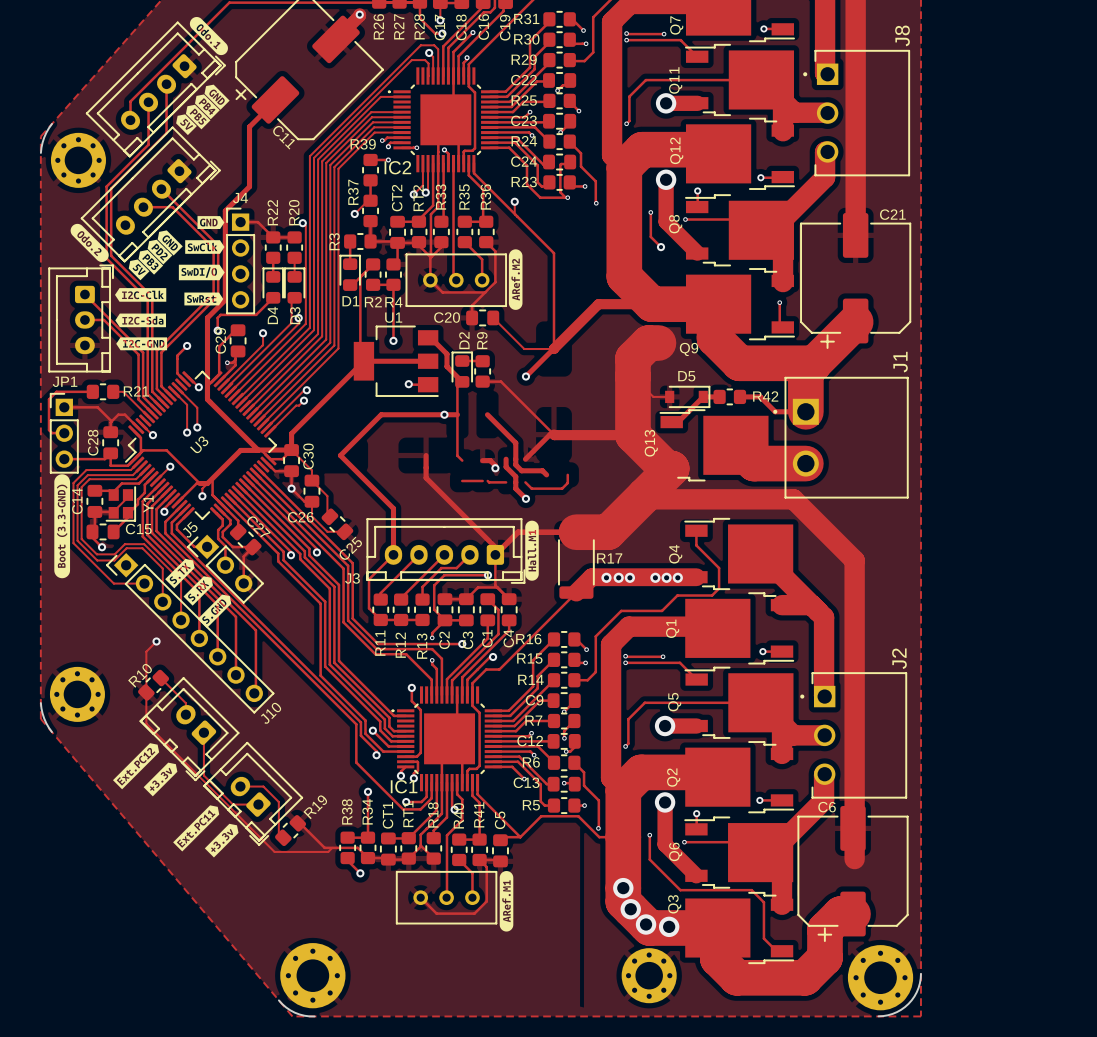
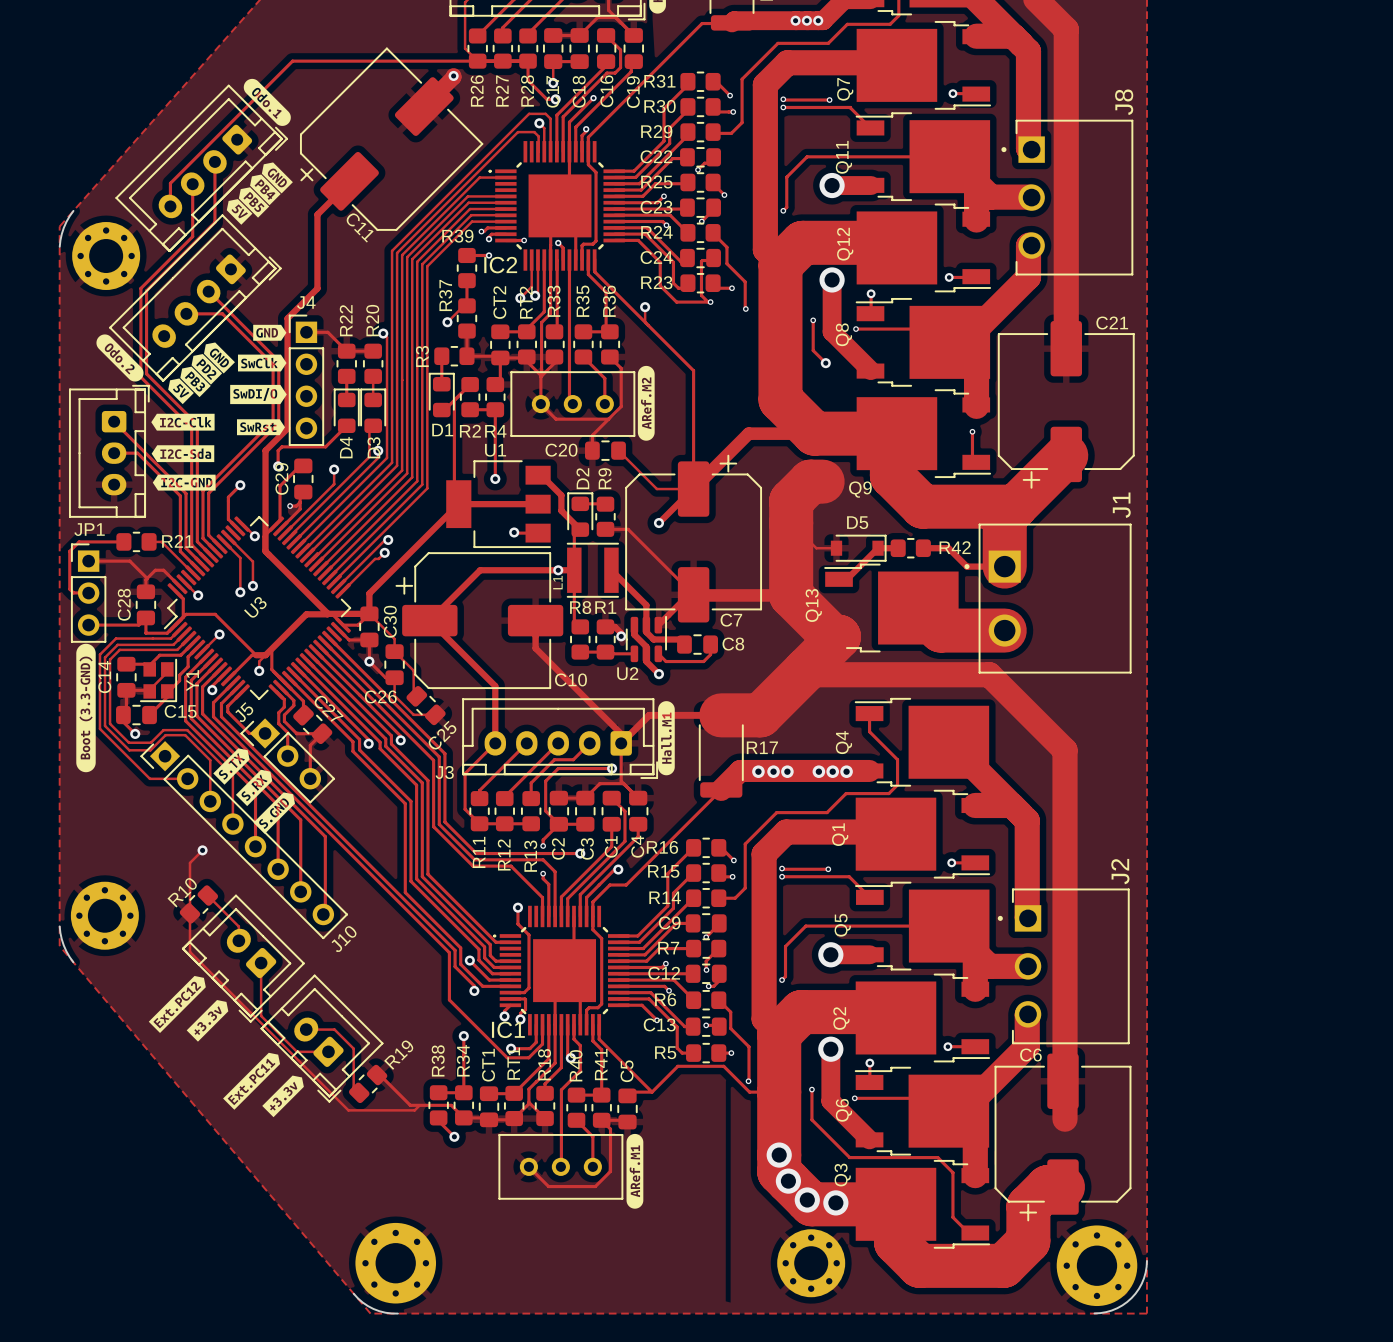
C7: none -> (693, 538)
L1: none -> (592, 570)
C10: none -> (479, 620)
R8: none -> (580, 639)
R1: none -> (605, 639)
U2: none -> (646, 639)
C8: none -> (697, 644)

